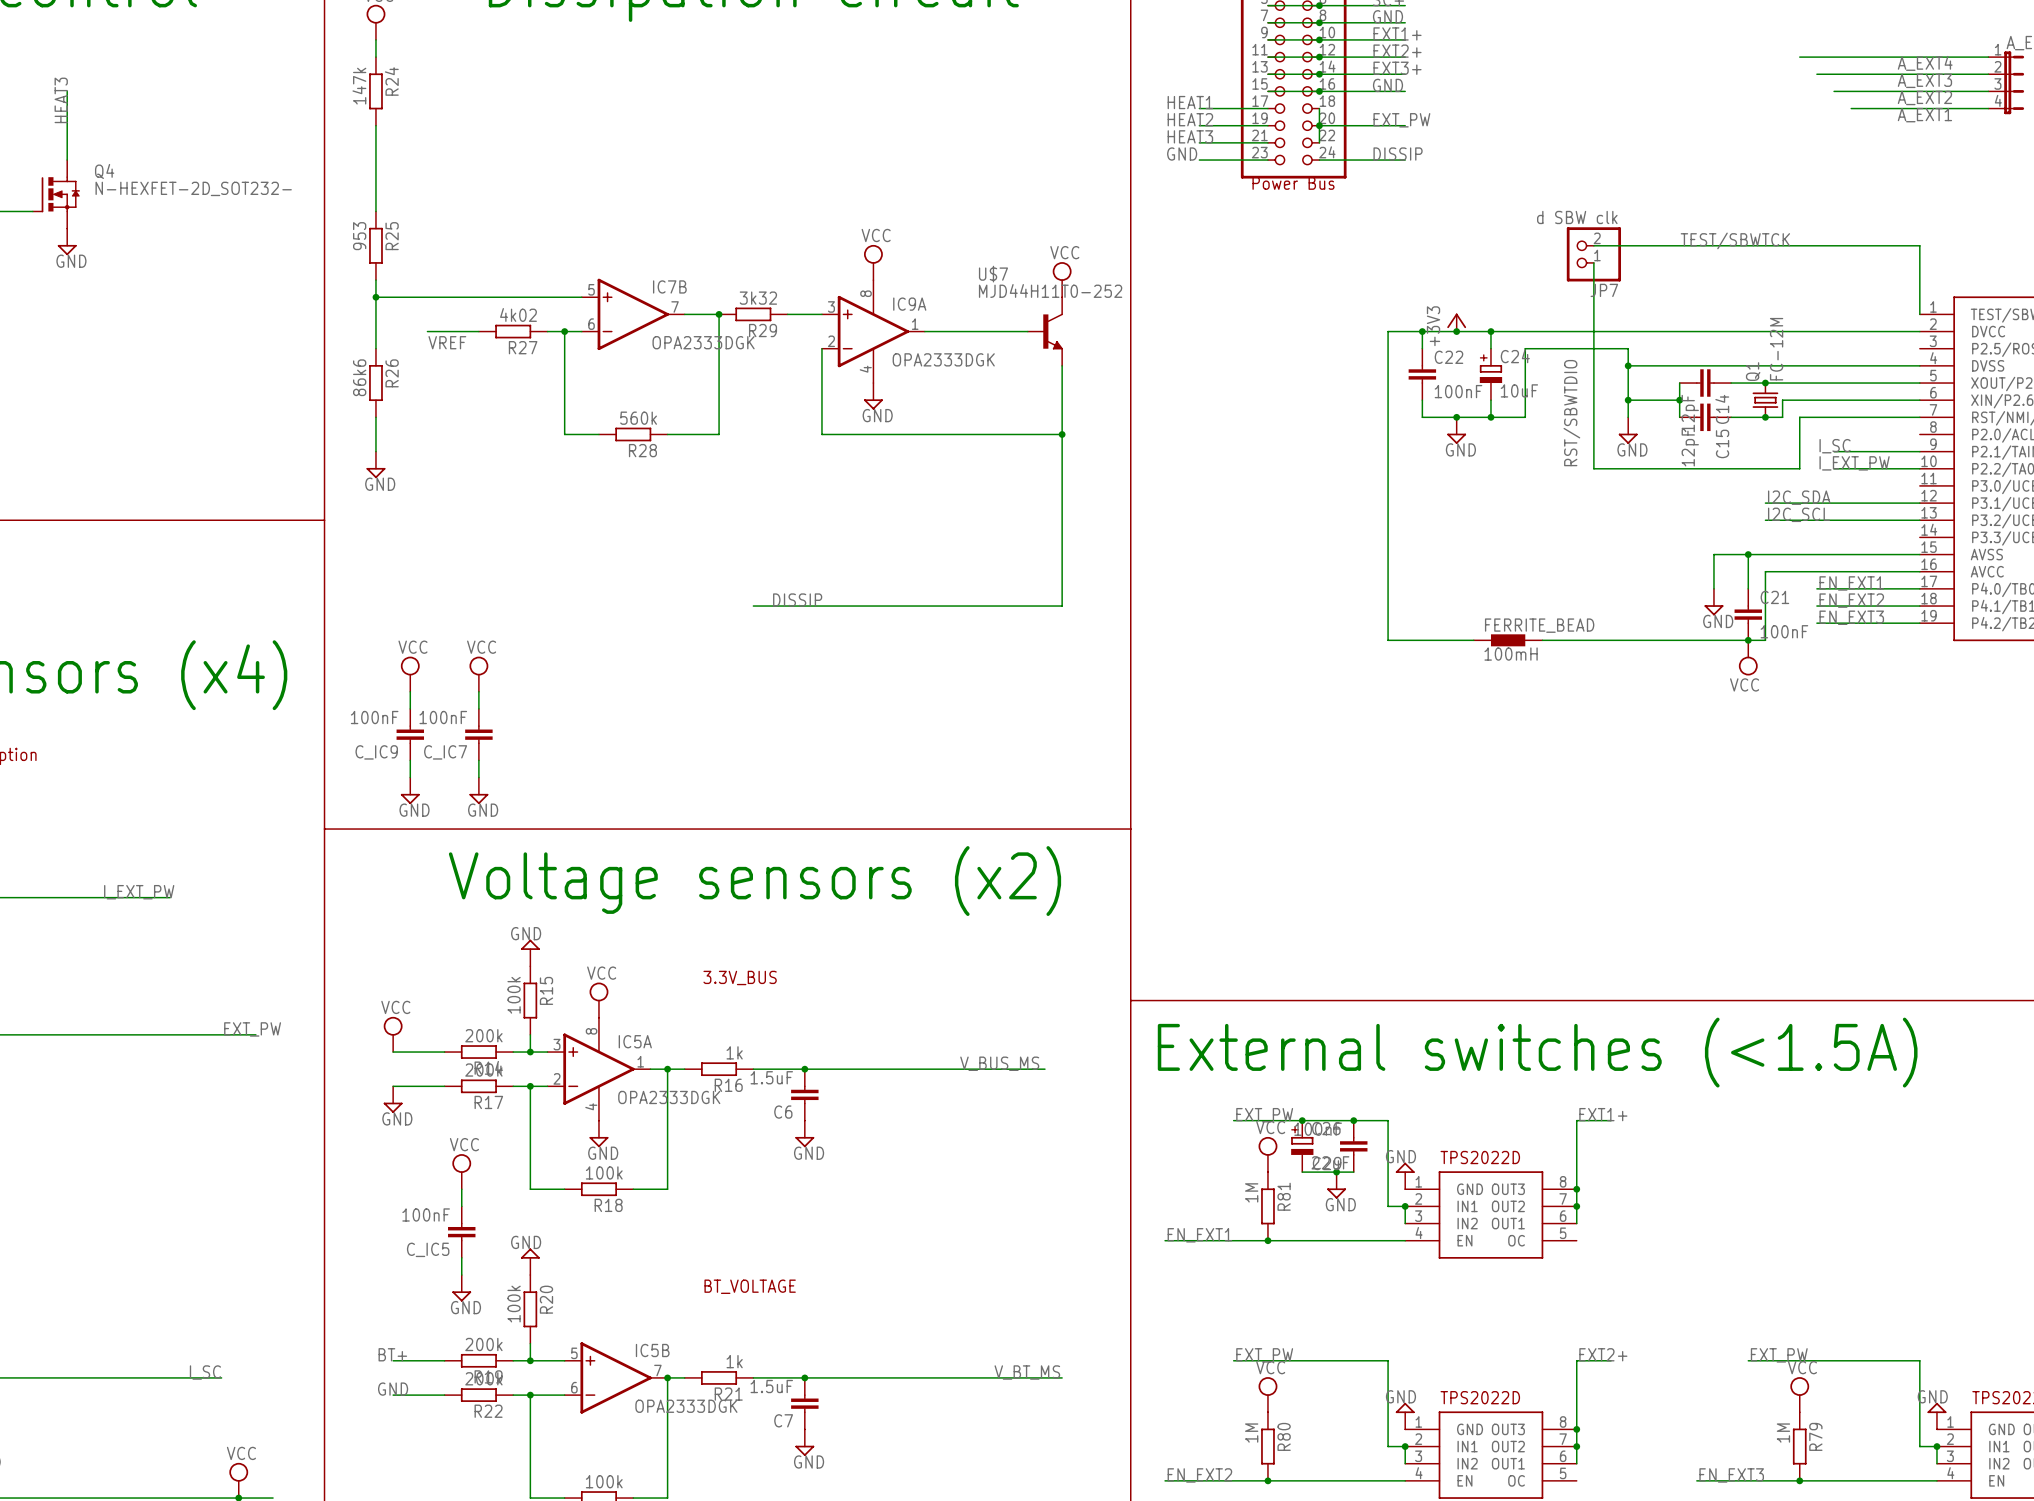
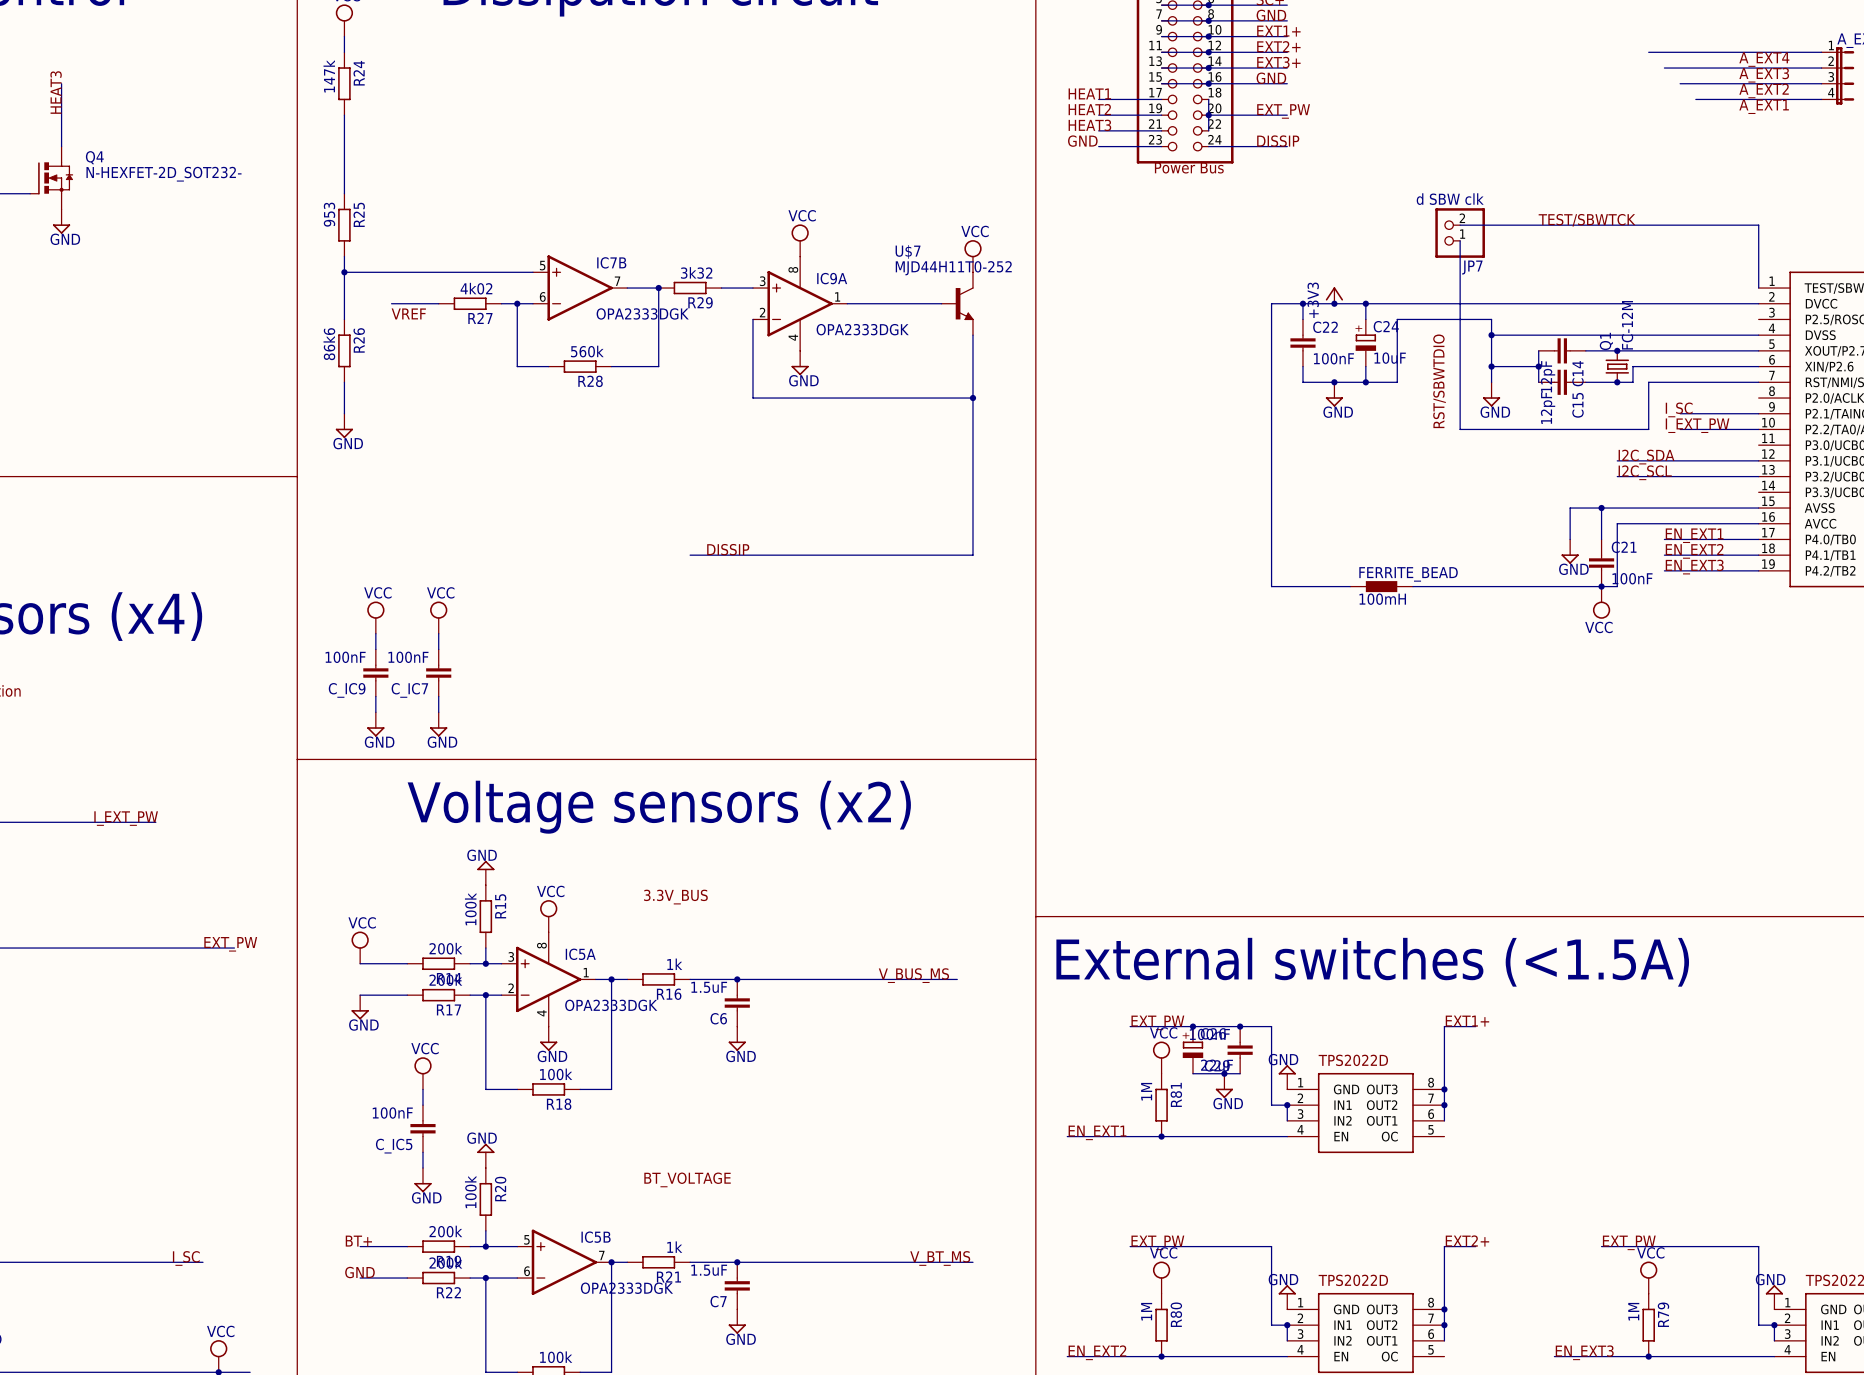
wire: (564, 400) (564, 434) (598, 434) -> (517, 366) (548, 366)
wire: (719, 400) (719, 434) (667, 434) -> (658, 366) (611, 366)
R28 position: (633, 434) -> (580, 366)

